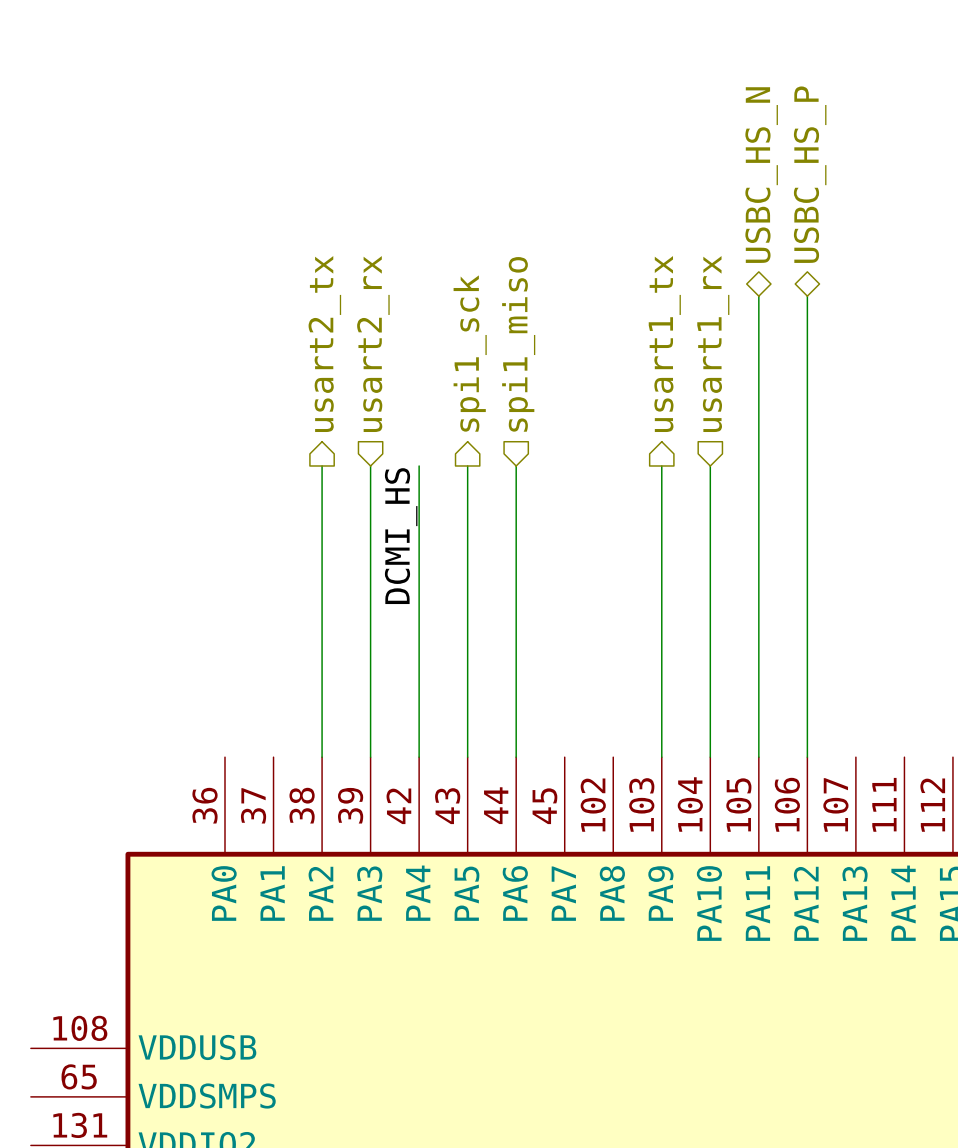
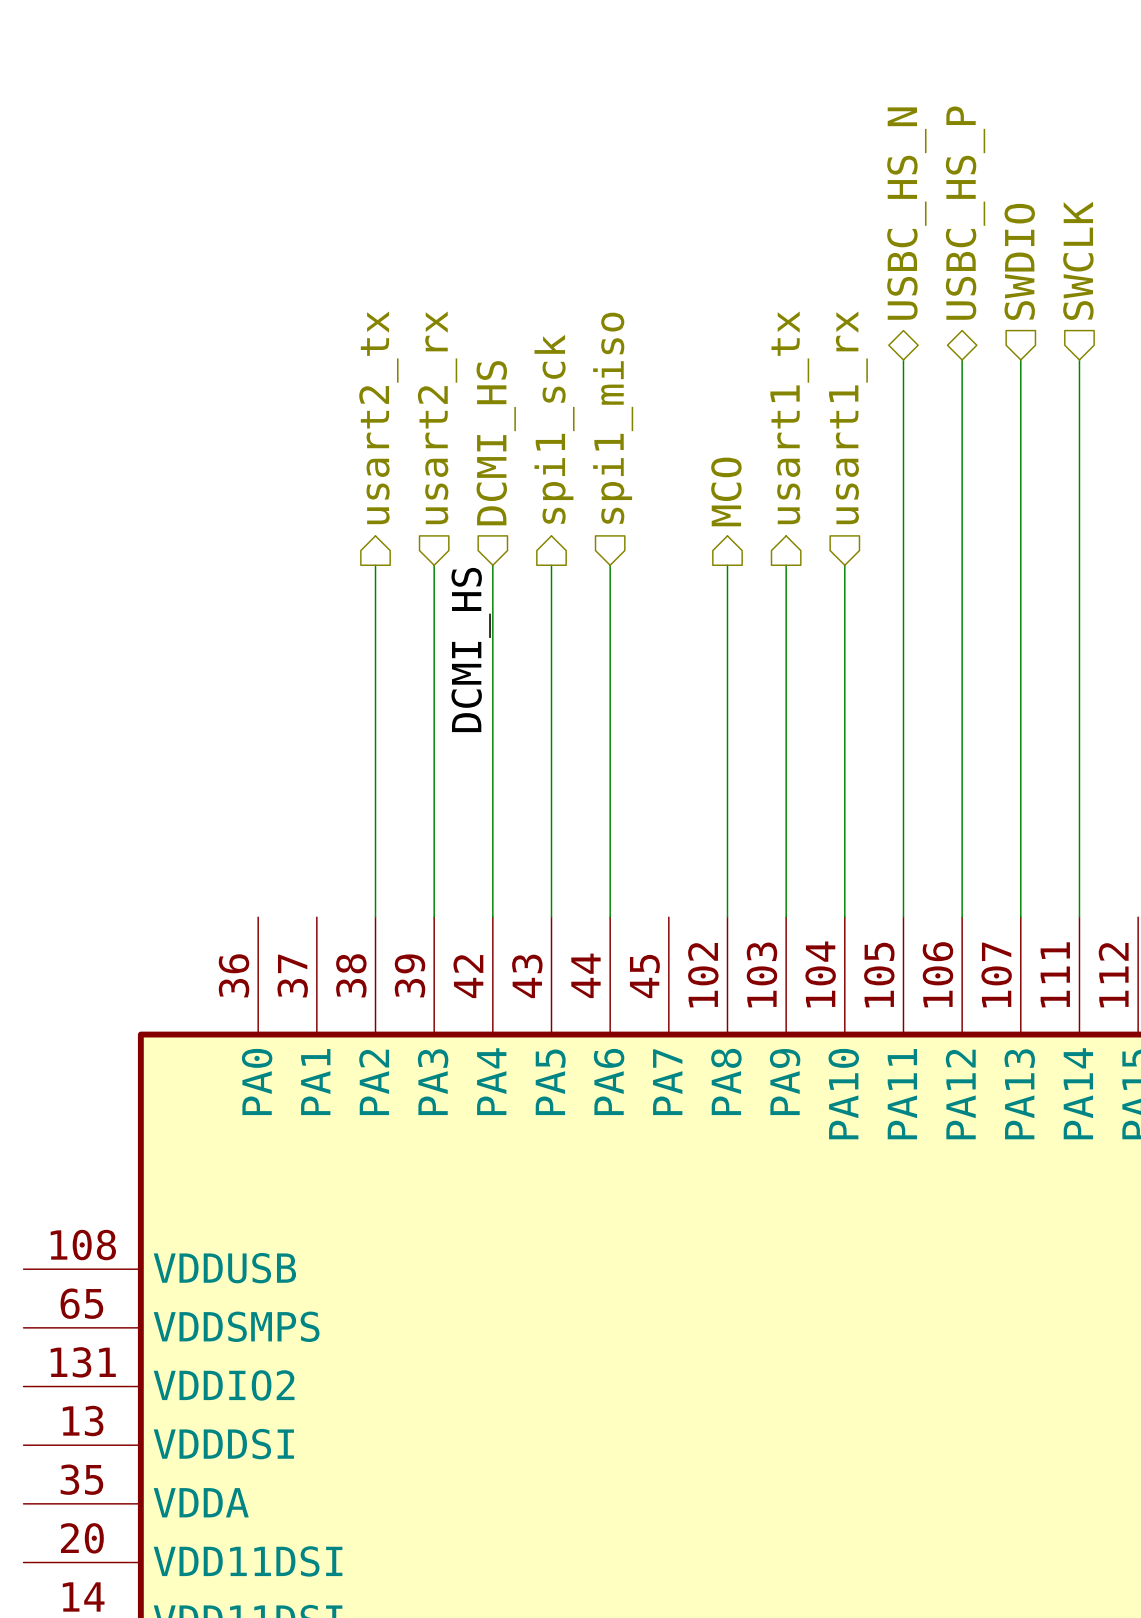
hierarchical label: none -> SWCLK (1078, 260)
hierarchical label: none -> SWDIO (1019, 261)
wire: none -> (1020, 359) (1020, 917)
wire: none -> (1079, 359) (1079, 917)
hierarchical label: none -> DCMI_HS (496, 443)
hierarchical label: none -> MCO (726, 491)
wire: none -> (727, 565) (727, 917)

